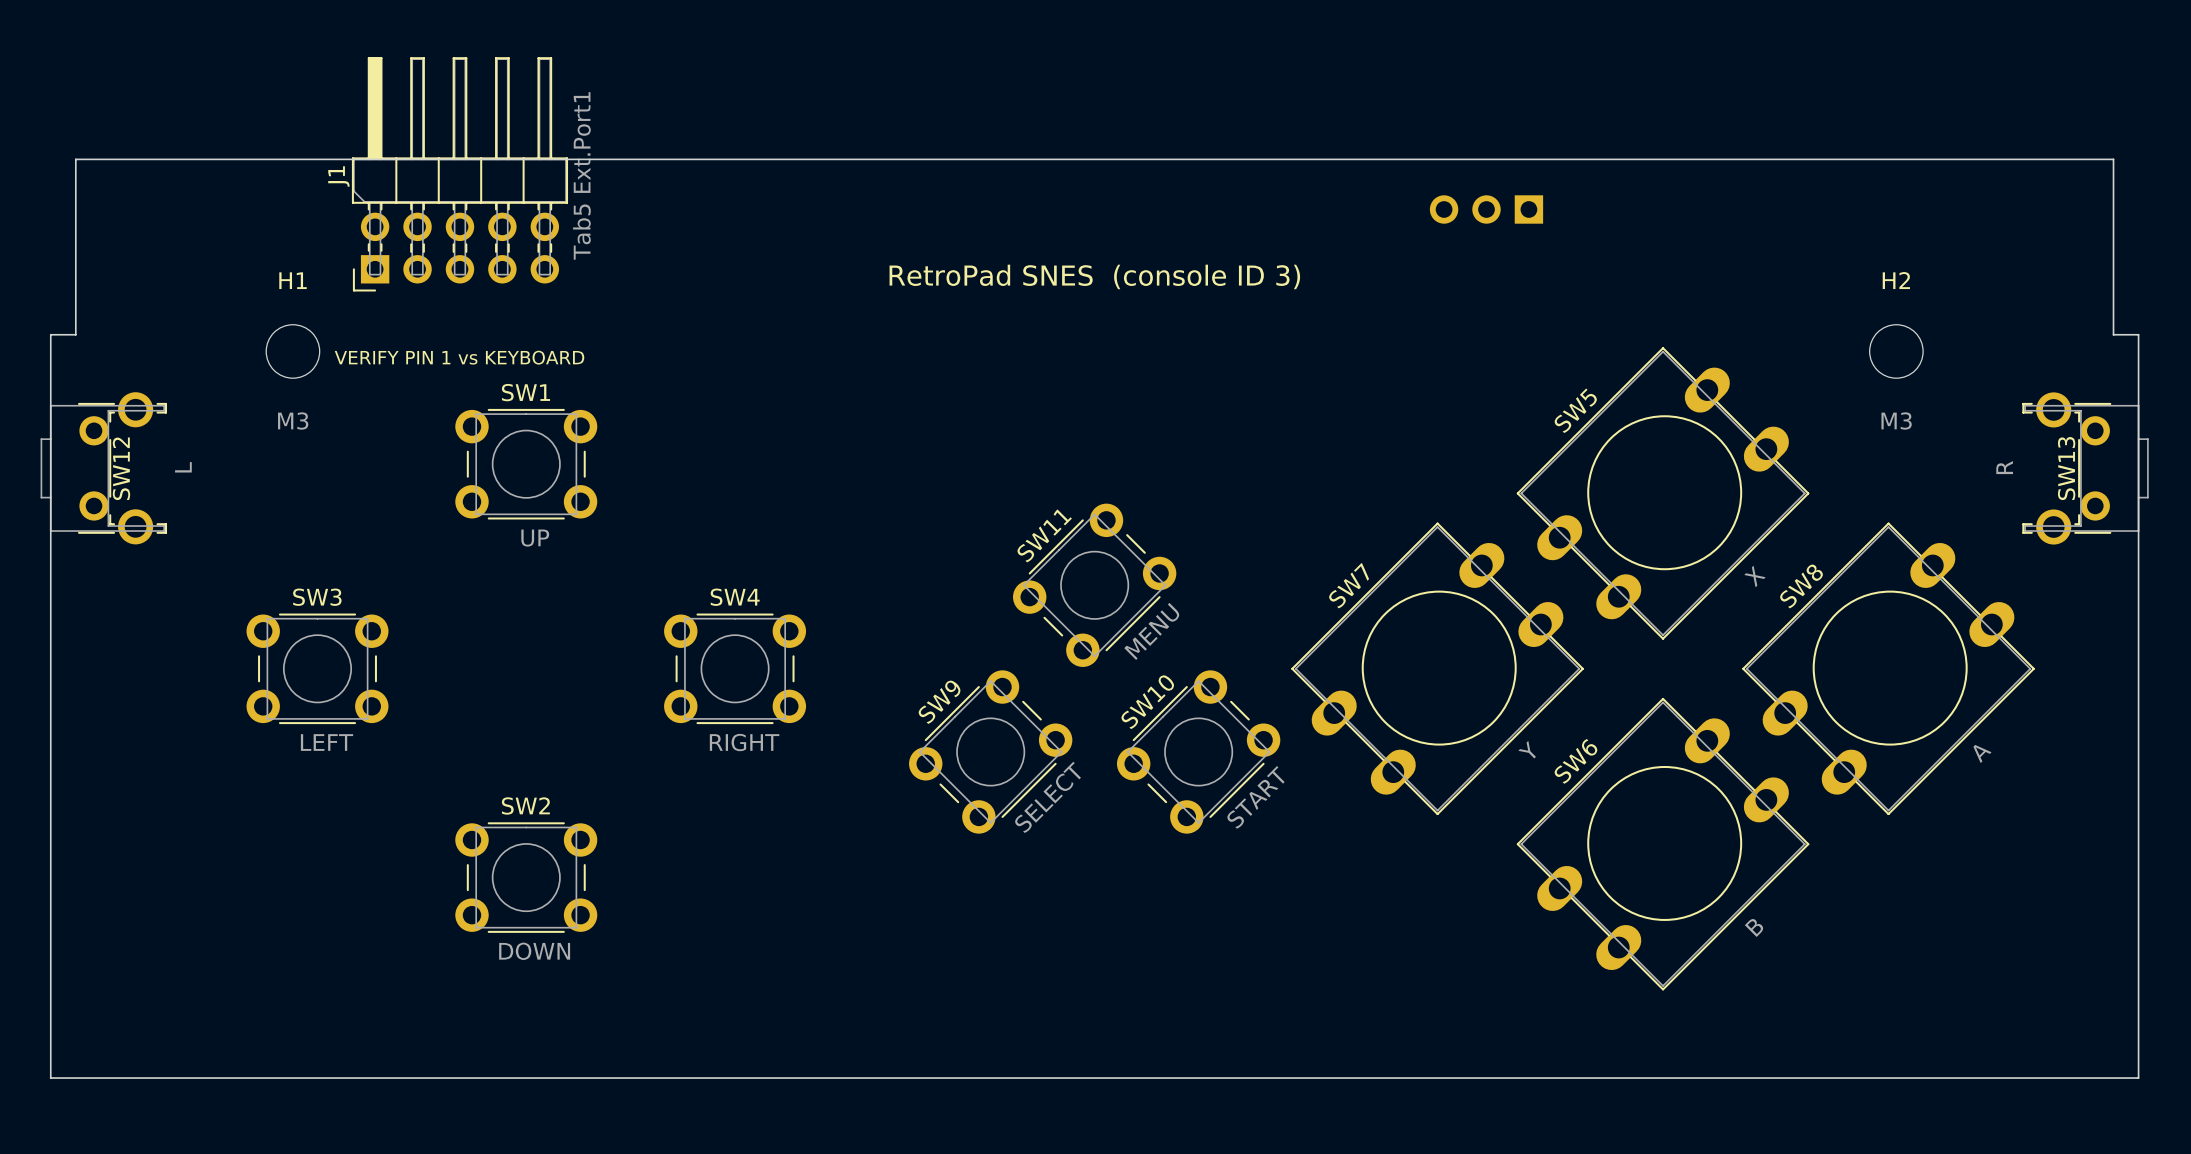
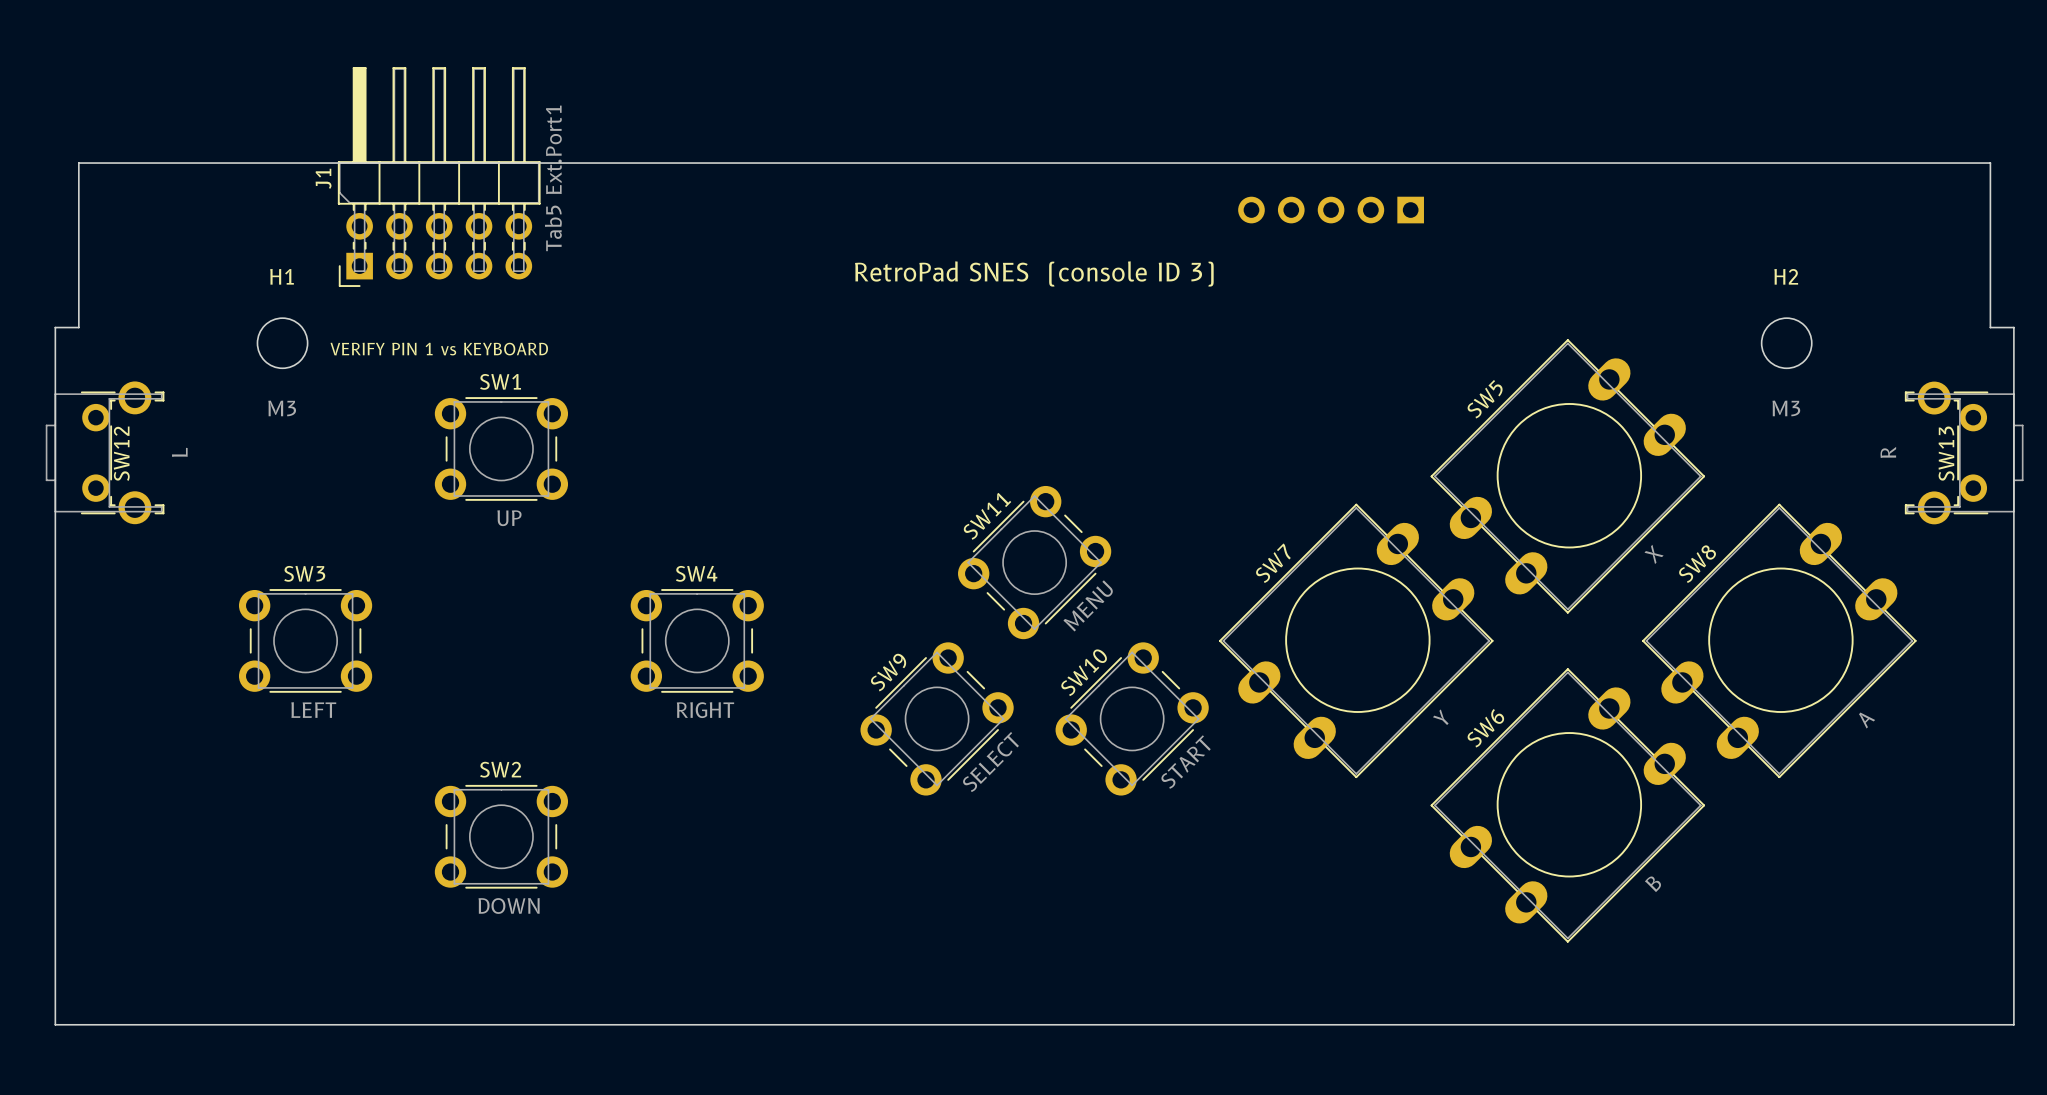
part: none -> (1331, 210)
part: (1486, 209) -> none

